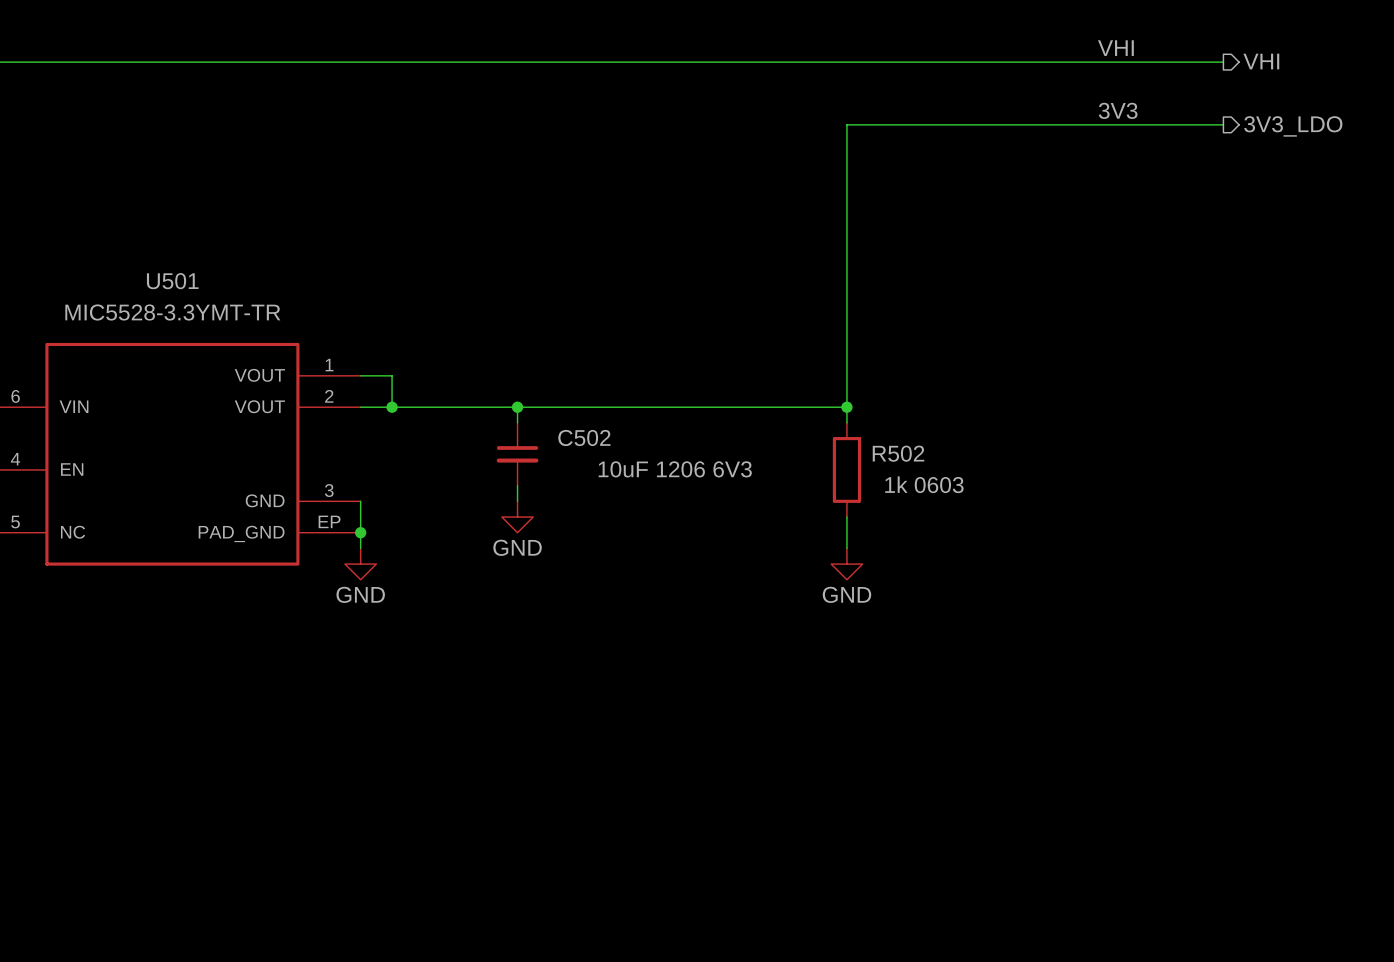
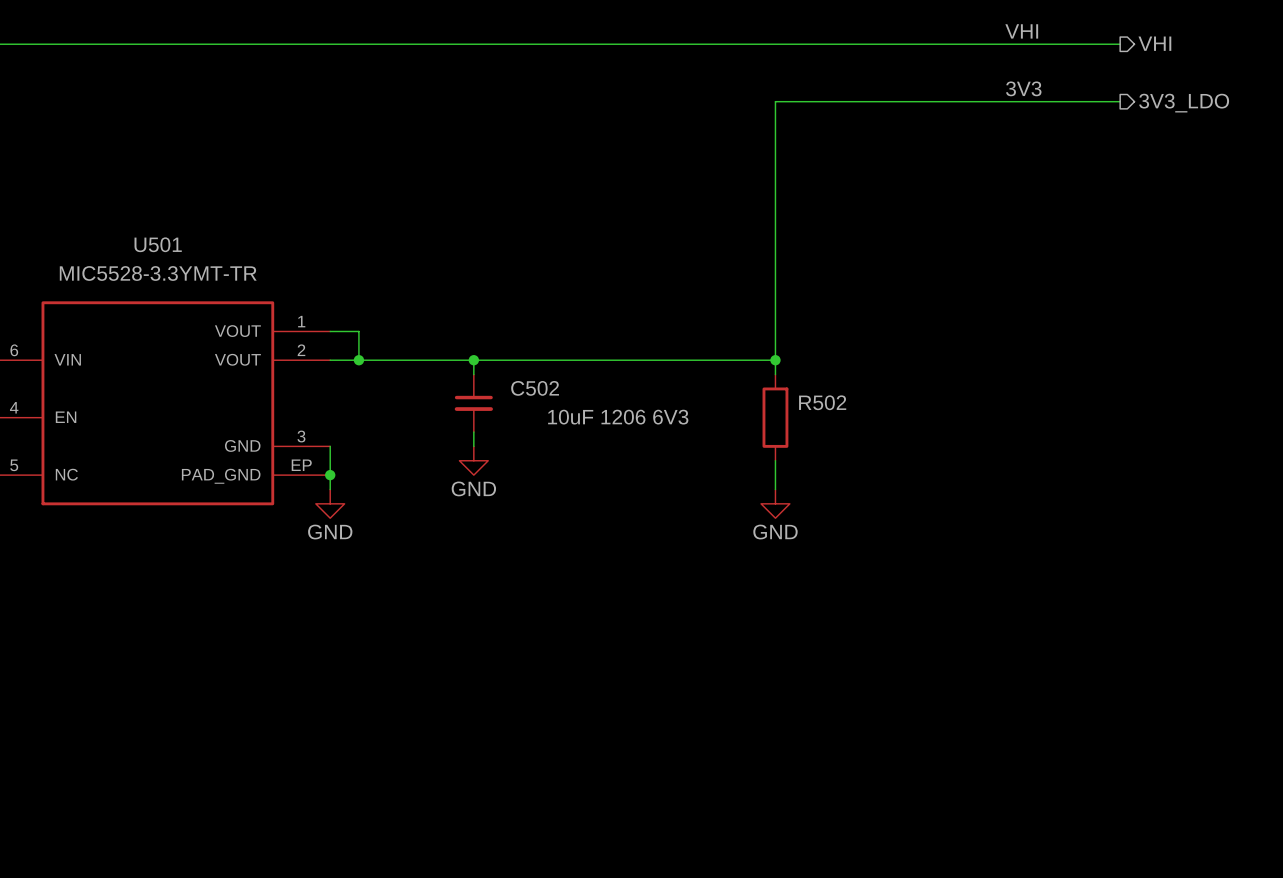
R502 value: 1k 0603 (924, 484) -> none

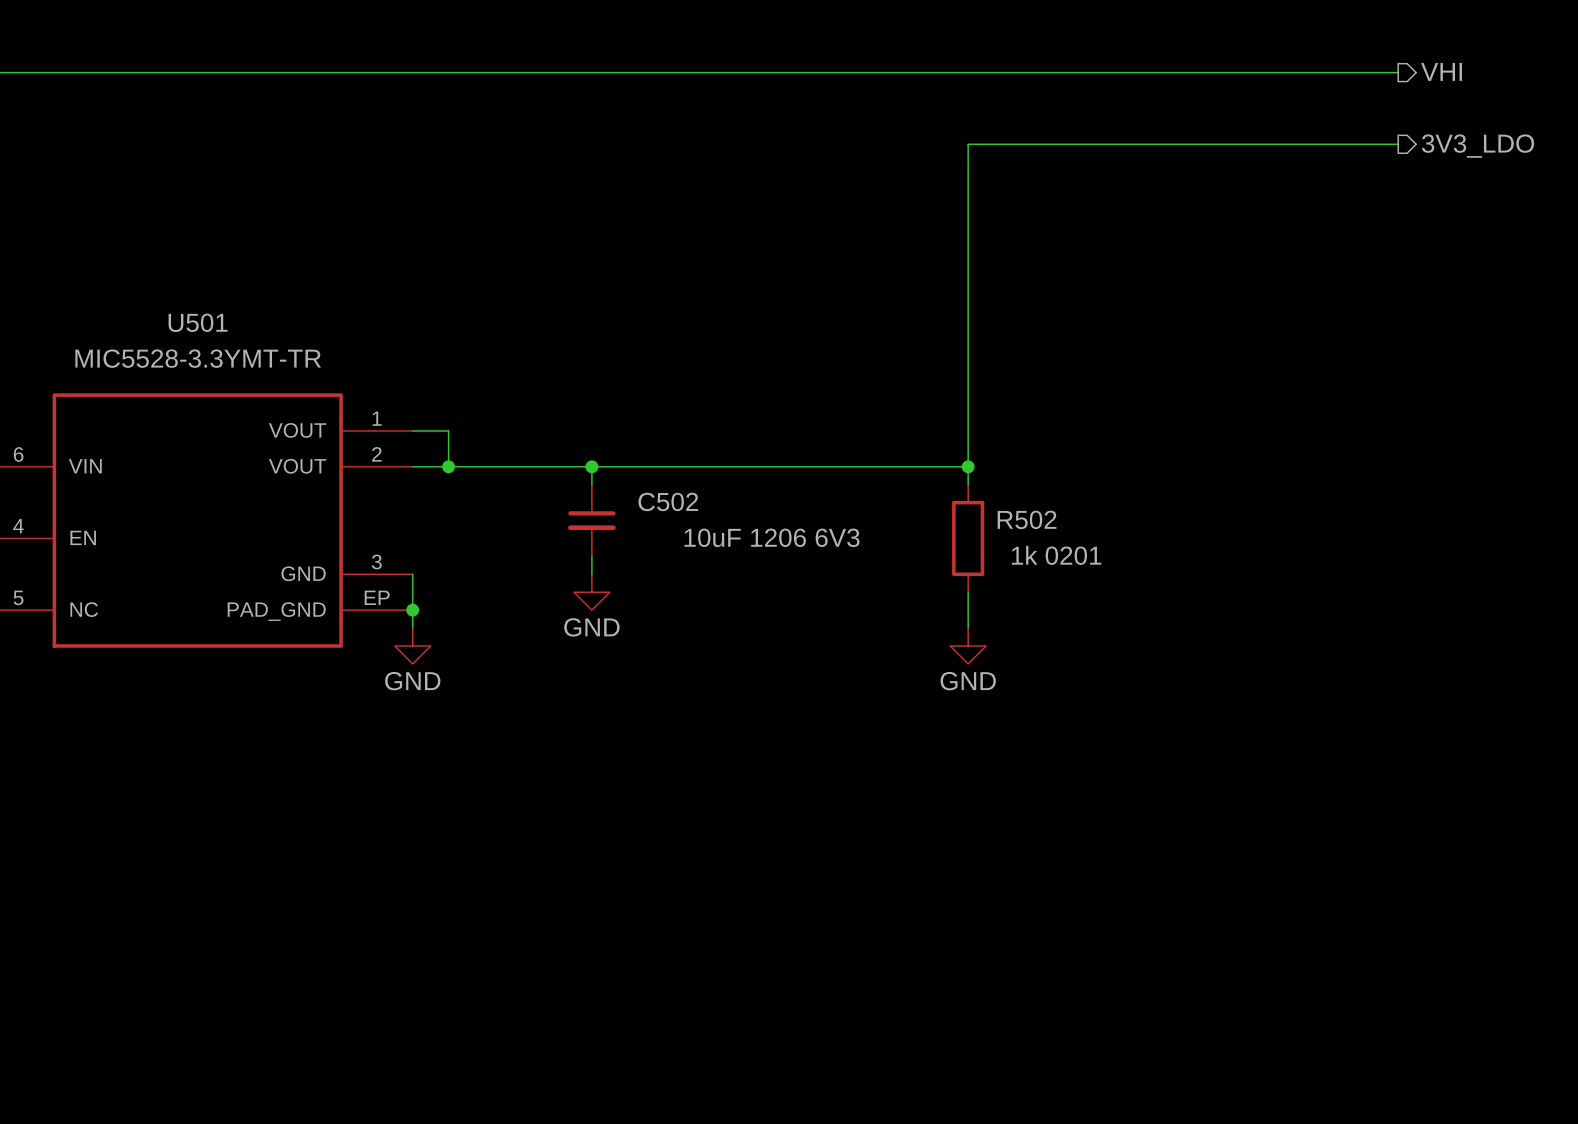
label: VHI (1021, 31) -> none
label: 3V3 (1023, 88) -> none
R502 value: none -> 1k 0201 (1056, 555)

